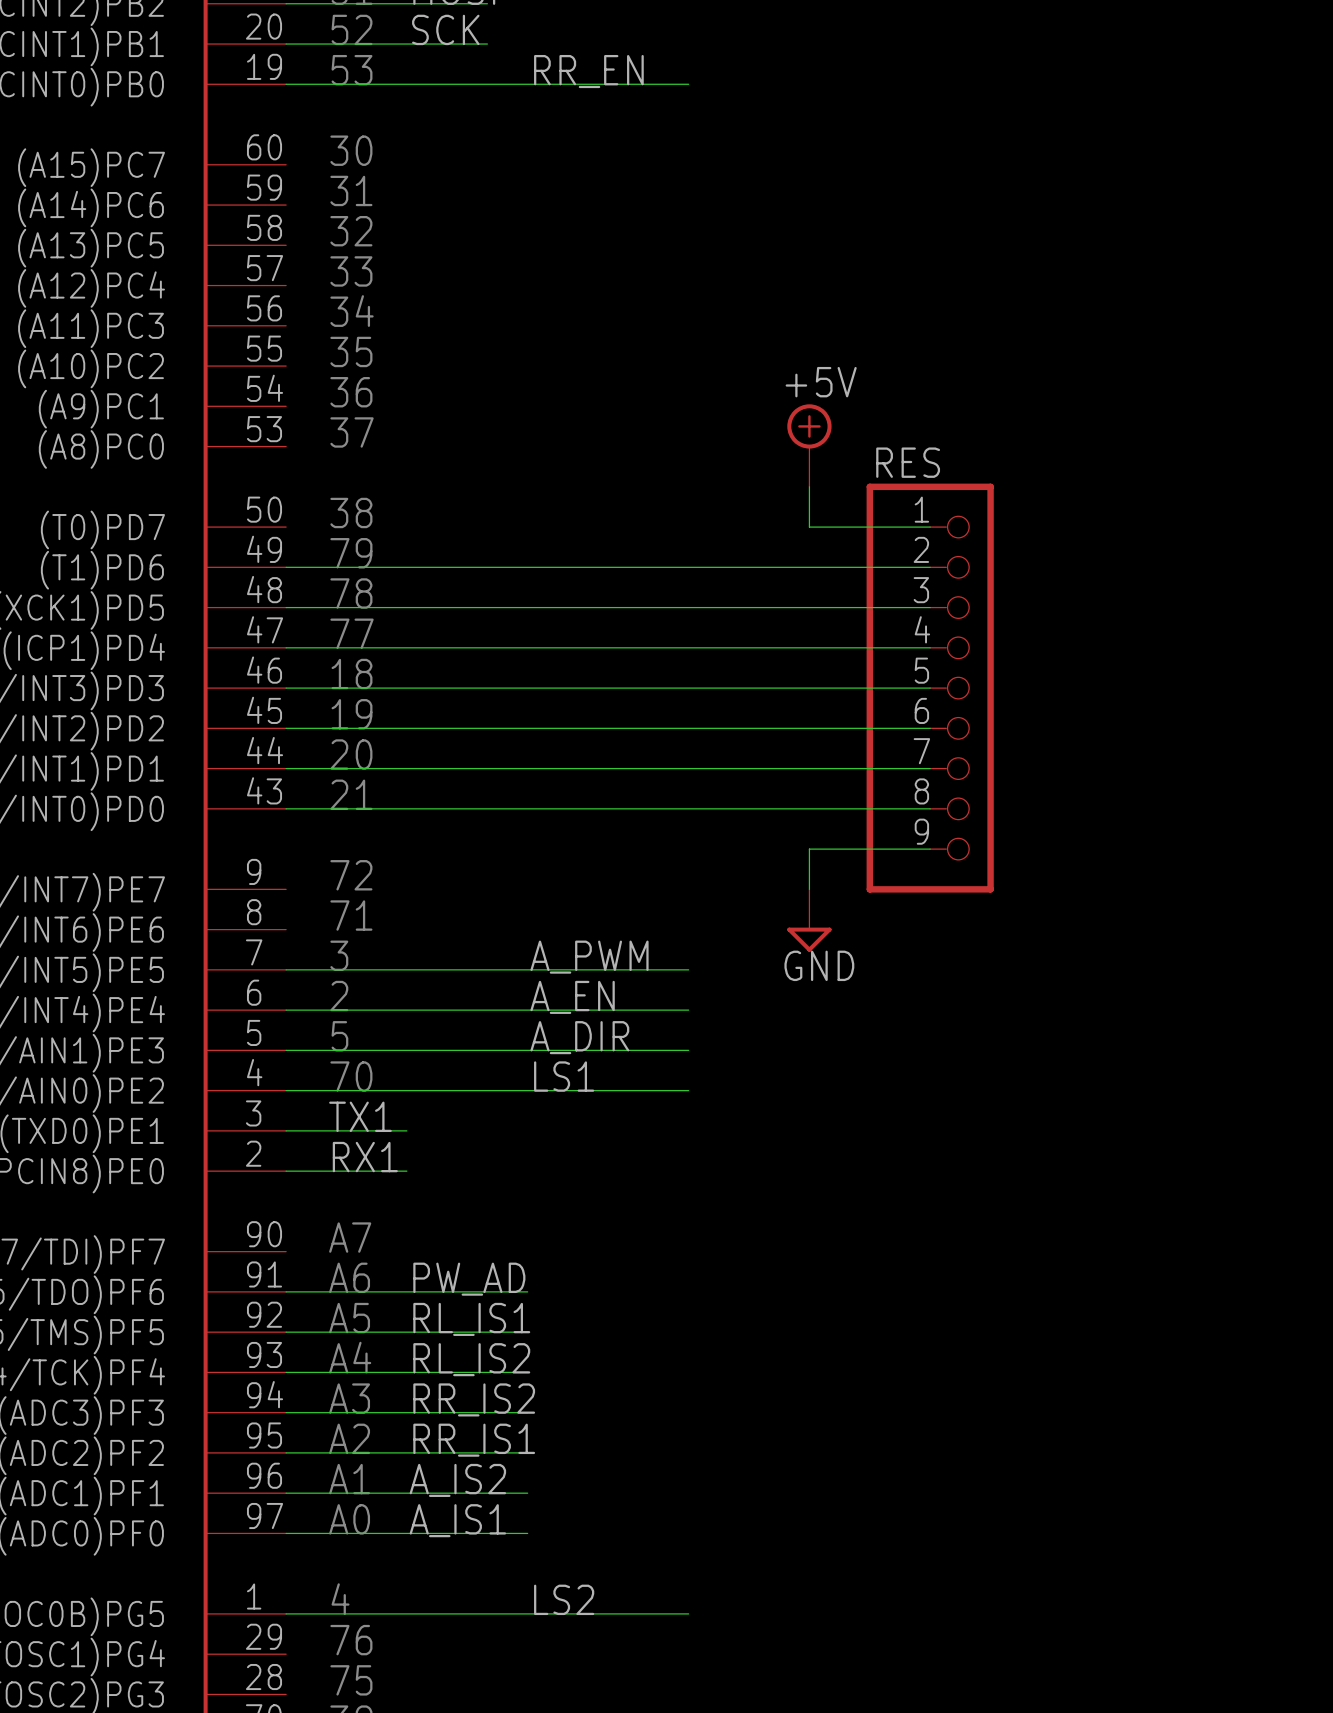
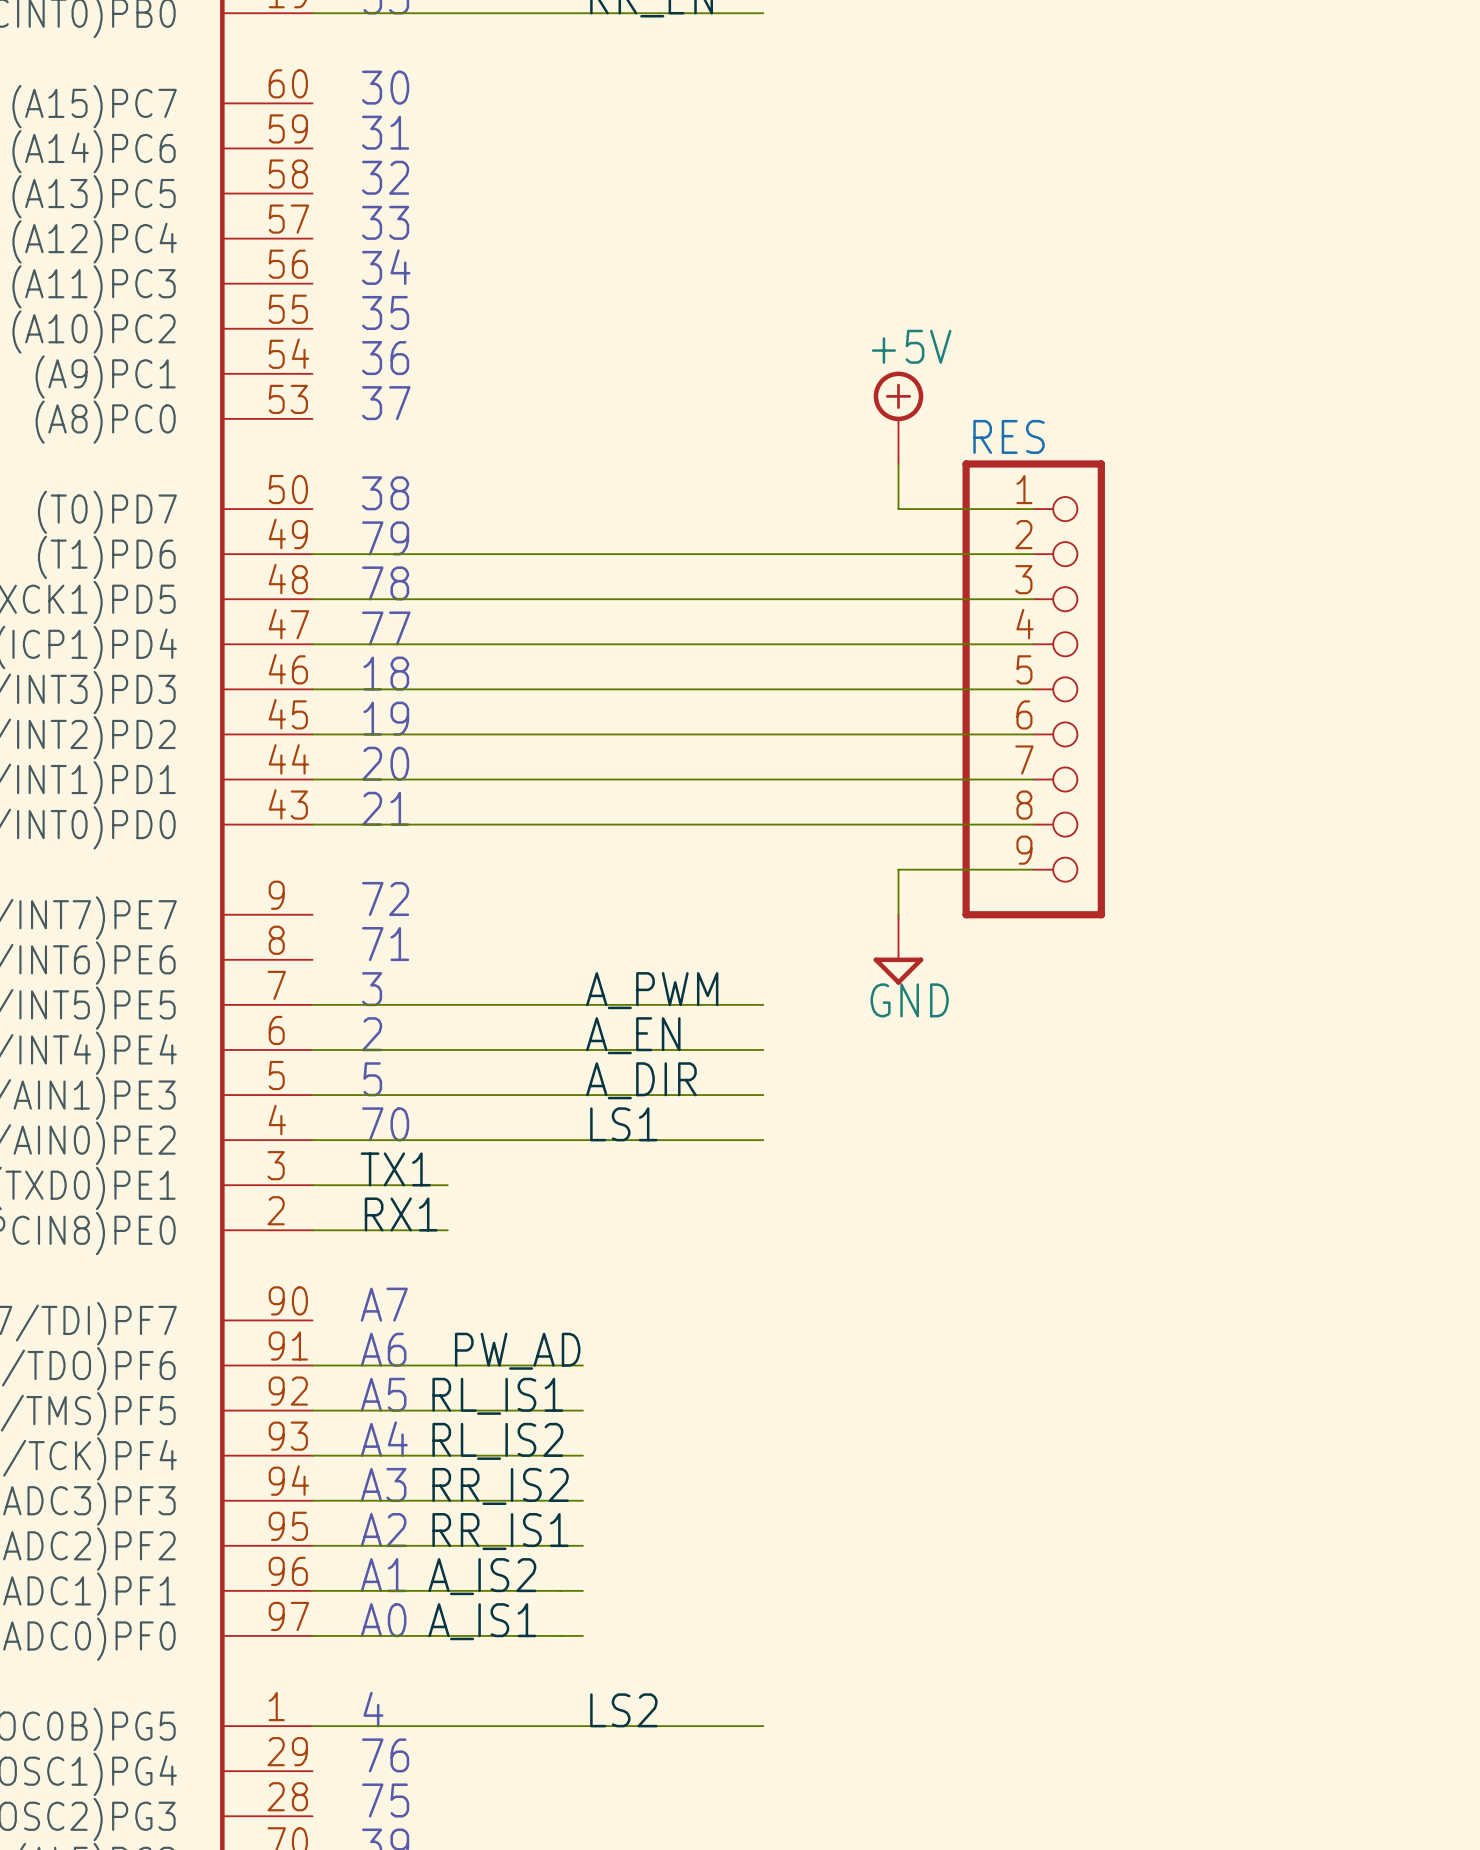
label position: RL_IS1 (471, 1319) -> RL_IS1 (497, 1396)
label position: RL_IS2 (471, 1359) -> RL_IS2 (497, 1441)
label position: RR_IS2 (474, 1399) -> RR_IS2 (500, 1486)
label position: RR_IS1 (474, 1440) -> RR_IS1 (500, 1531)
label position: A_IS2 (457, 1480) -> A_IS2 (482, 1576)
label position: A_IS1 (457, 1520) -> A_IS1 (482, 1621)

